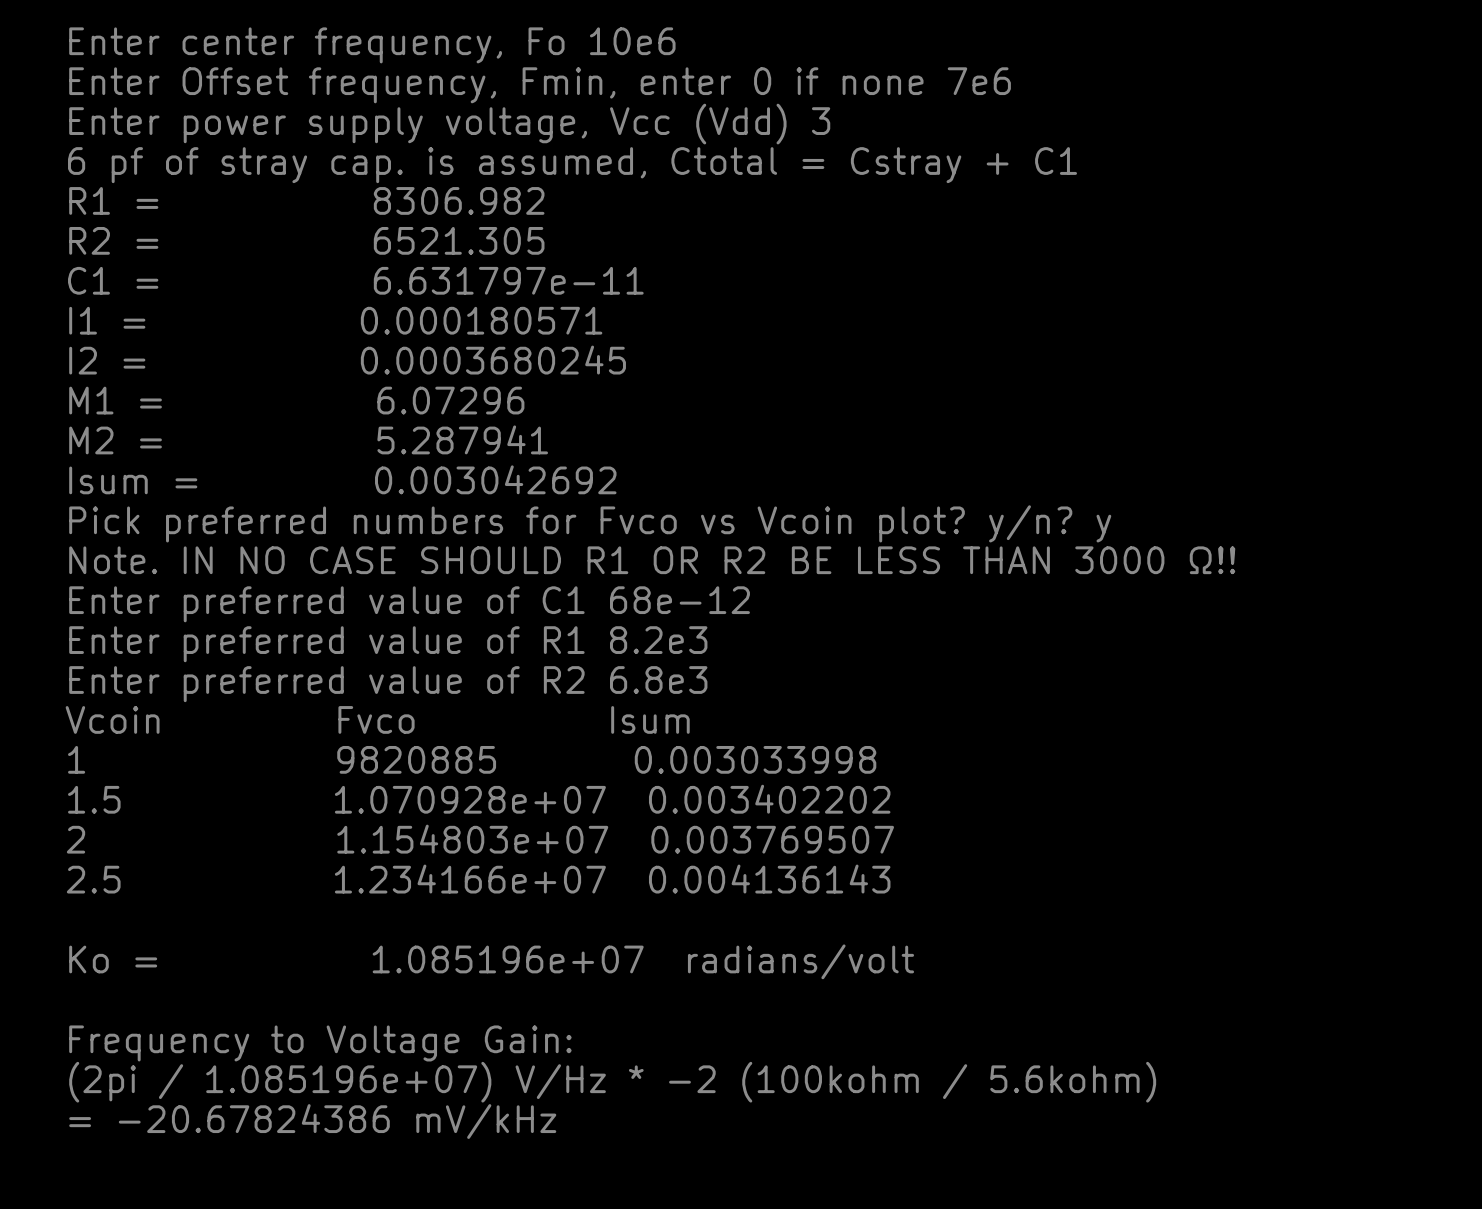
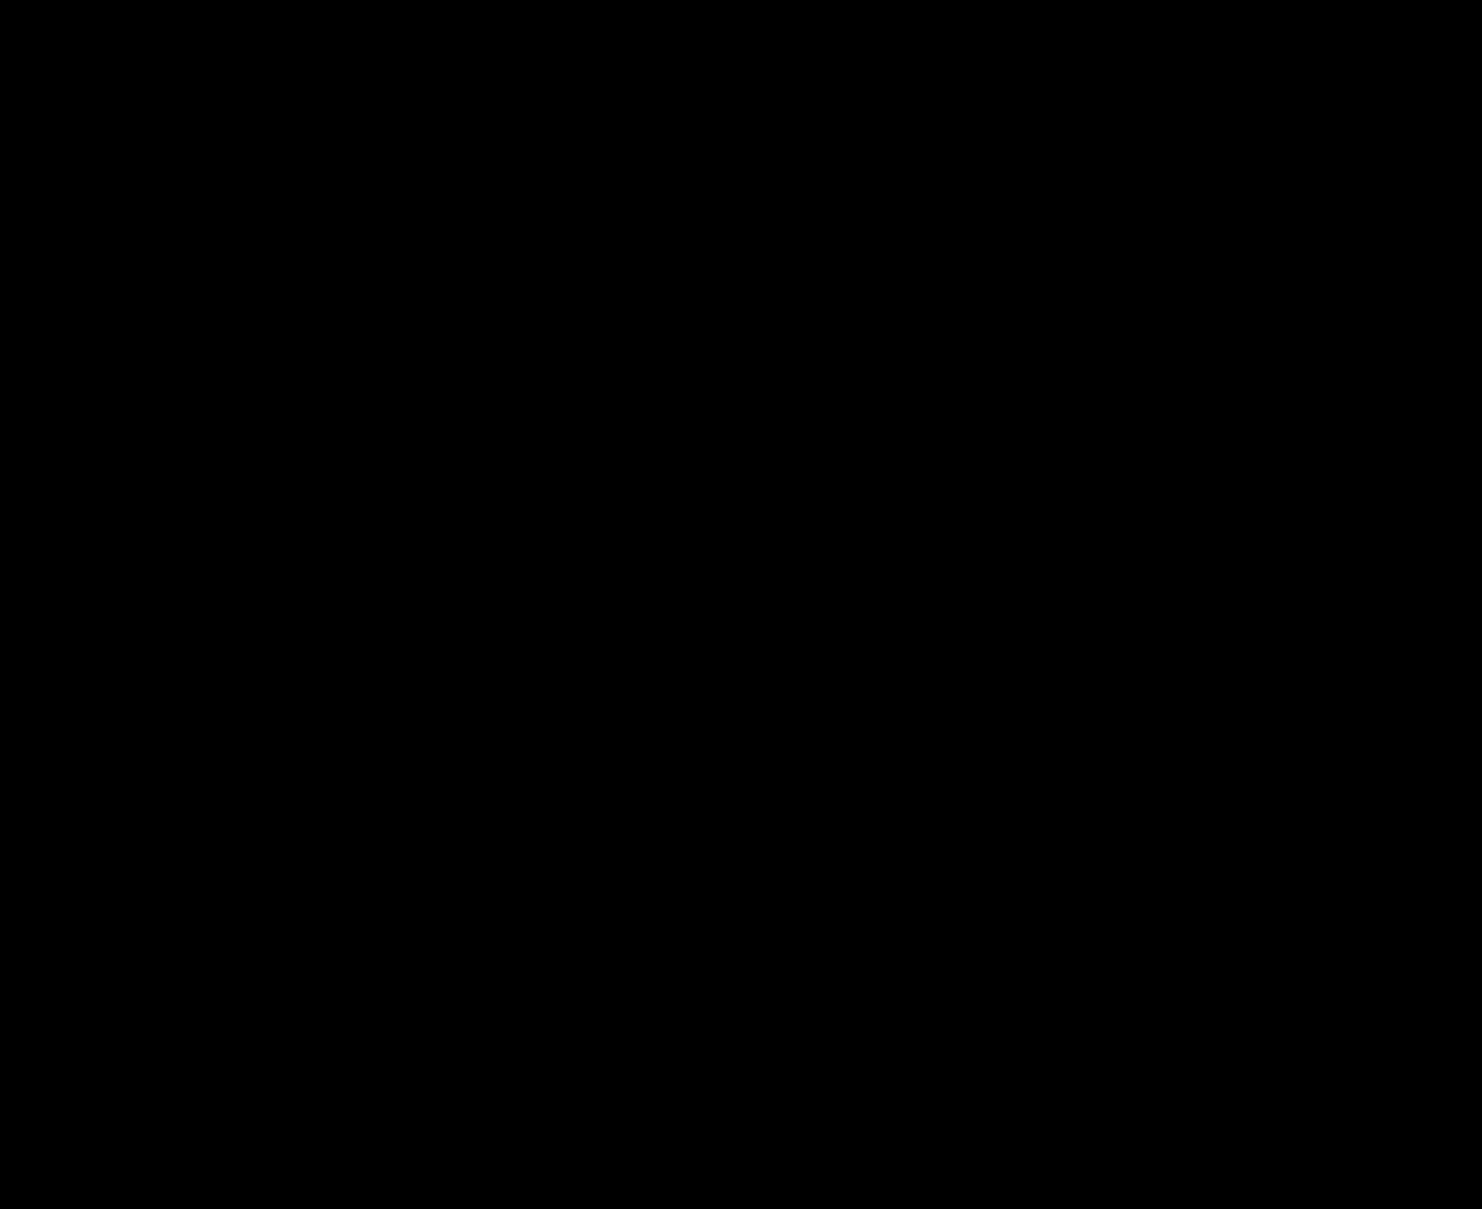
text: Enter center frequency, Fo 10e6 (372, 45) -> none
text: Enter Offset frequency, Fmin, enter 0 if none 7e6 (540, 85) -> none
text: Enter power supply voltage, Vcc (Vdd) 3 (449, 124) -> none
text: 6 pf of stray cap. is assumed, Ctotal = Cstray + C1 (572, 165) -> none
text: R1 = 8306.982 (306, 200) -> none
text: R2 = 6521.305 (306, 240) -> none
text: C1 = 6.631797e-11 (355, 280) -> none
text: I1 = 0.000180571 (335, 320) -> none
text: I2 = 0.0003680245 (347, 360) -> none
text: M1 = 6.07296 (296, 400) -> none
text: M2 = 5.287941 (308, 439) -> none
text: Isum = 0.003042692 (342, 479) -> none
text: Pick preferred numbers for Fvco vs Vcoin plot? y/n? y (590, 523) -> none
text: Note. IN NO CASE SHOULD R1 OR R2 BE LESS THAN 3000 Ω!! (652, 560) -> none
text: Enter preferred value of C1 68e-12 (409, 604) -> none
text: Enter preferred value of R1 8.2e3 (388, 644) -> none
text: Enter preferred value of R2 6.8e3 (388, 684) -> none
text: Vcoin Fvco Isum (377, 719) -> none
text: 1 9820885 0.003033998 (472, 759) -> none
text: 1.5 1.070928e+07 0.003402202 (479, 799) -> none
text: 2 1.154803e+07 0.003769507 (480, 839) -> none
text: 2.5 1.234166e+07 0.004136143 (478, 879) -> none
text: Ko = 1.085196e+07 radians/volt (491, 961) -> none
text: Frequency to Voltage Gain: (320, 1043) -> none
text: (2pi / 1.085196e+07) V/Hz * -2 (100kohm / 5.6kohm) (612, 1082) -> none
text: = -20.67824386 mV/kHz (312, 1121) -> none

